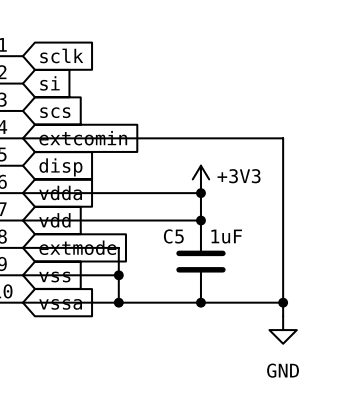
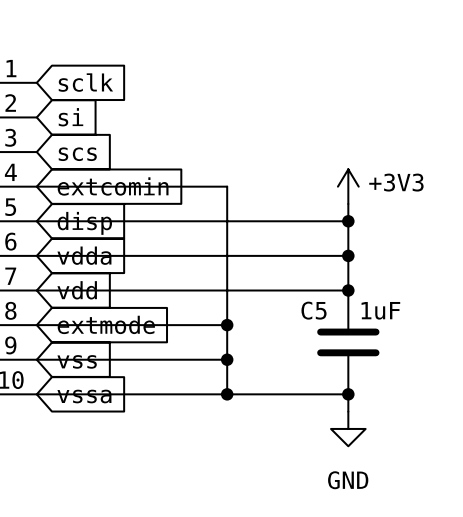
wire: (173, 138) (283, 138) (283, 316) -> (227, 186) (227, 394)
wire: none -> (348, 203) (348, 290) (261, 290)
wire: none -> (36, 221) (348, 221)
junction: none -> (348, 221)
power symbol position: +3V3 (200, 179) -> +3V3 (348, 186)
wire: (200, 193) (200, 220) -> (261, 255) (348, 255)
junction: (200, 193) -> none
junction: none -> (348, 255)
junction: (200, 220) -> none
junction: none -> (348, 290)
wire: (118, 247) (118, 302) -> (157, 325) (227, 325)
junction: none -> (227, 325)
C5 position: (200, 261) -> (348, 342)
wire: none -> (157, 359) (227, 359)
junction: (118, 275) -> none
junction: none -> (227, 359)
junction: (118, 302) -> none
junction: none -> (227, 394)
junction: (200, 302) -> none
wire: (269, 302) (283, 302) -> (348, 394) (348, 411)
junction position: (283, 302) -> (348, 394)
power symbol position: GND (283, 330) -> GND (348, 428)

